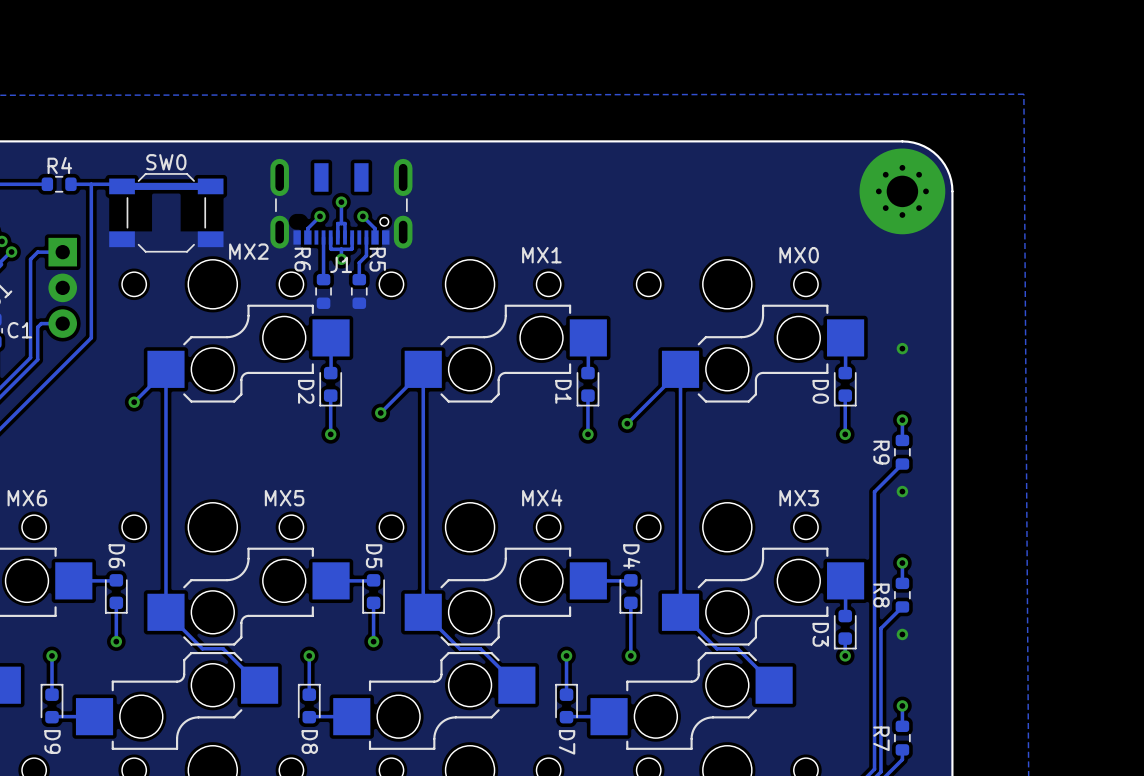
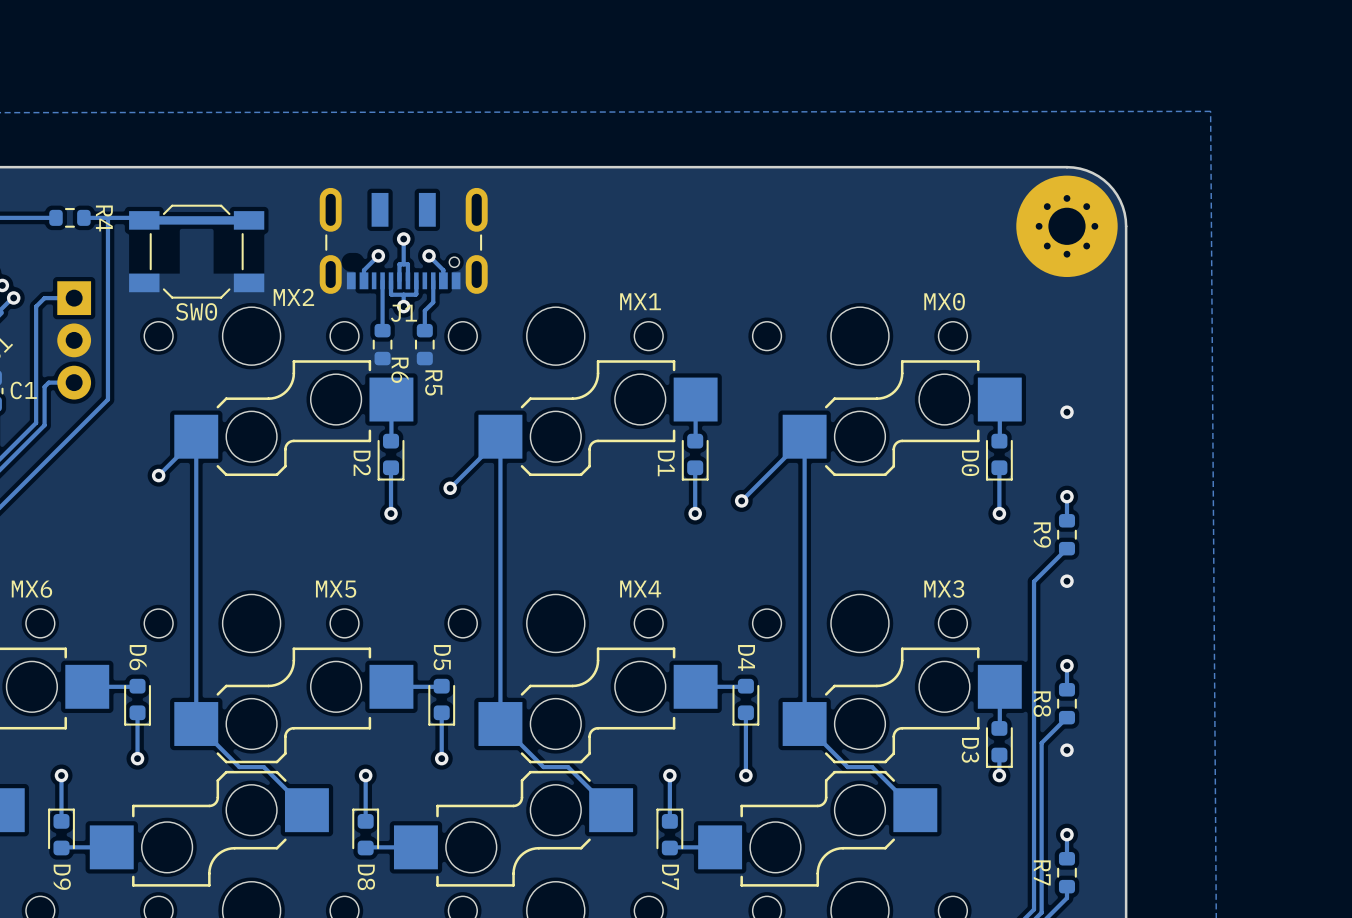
SW0 name position: SW0 (166, 162) -> SW0 (196, 311)
R4 name rotation: 0° (59, 165) -> 90° clockwise (104, 218)
R6 name position: R6 (302, 259) -> R6 (399, 370)
R5 name position: R5 (377, 259) -> R5 (433, 382)

